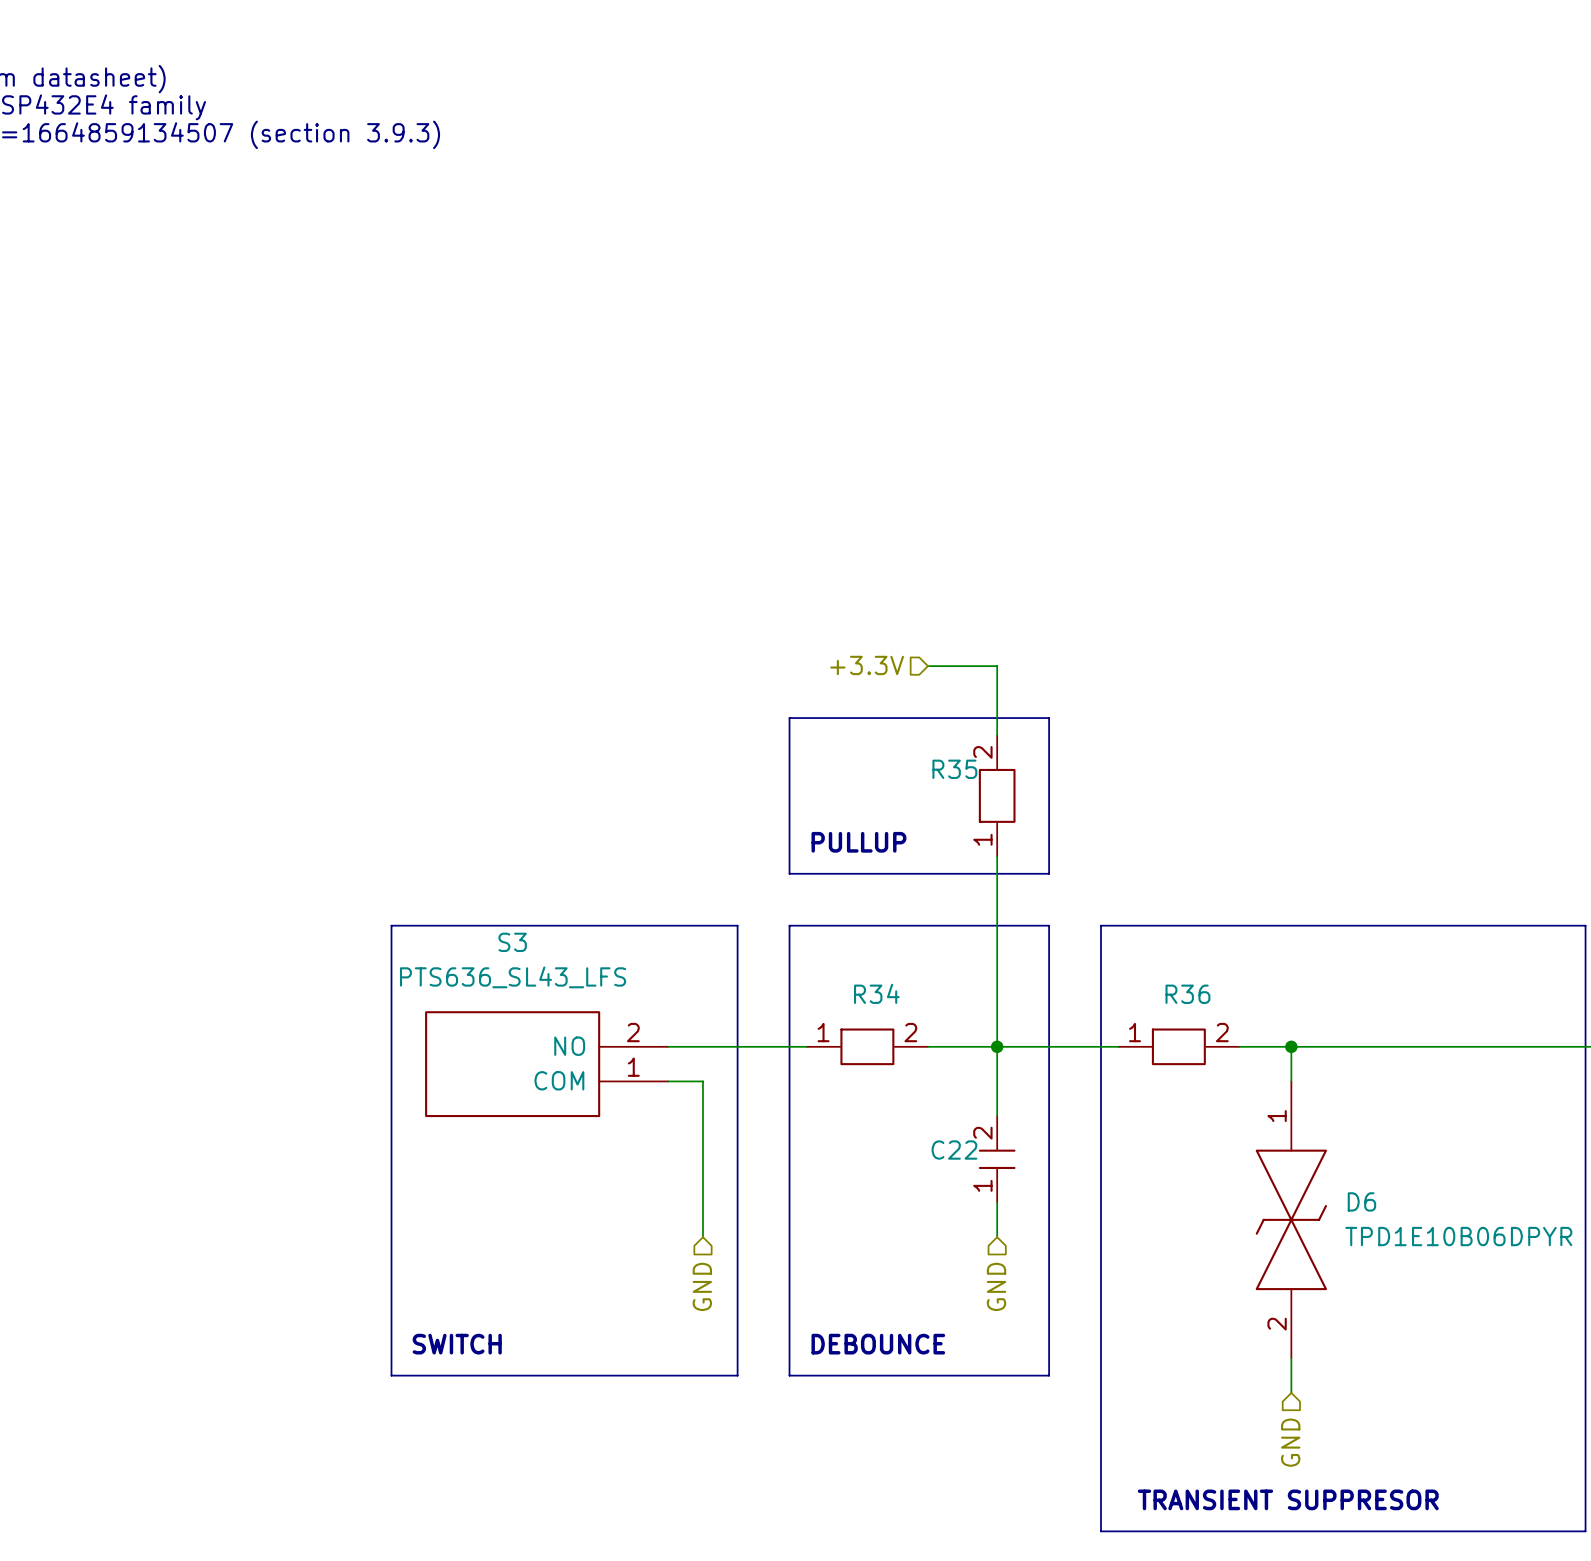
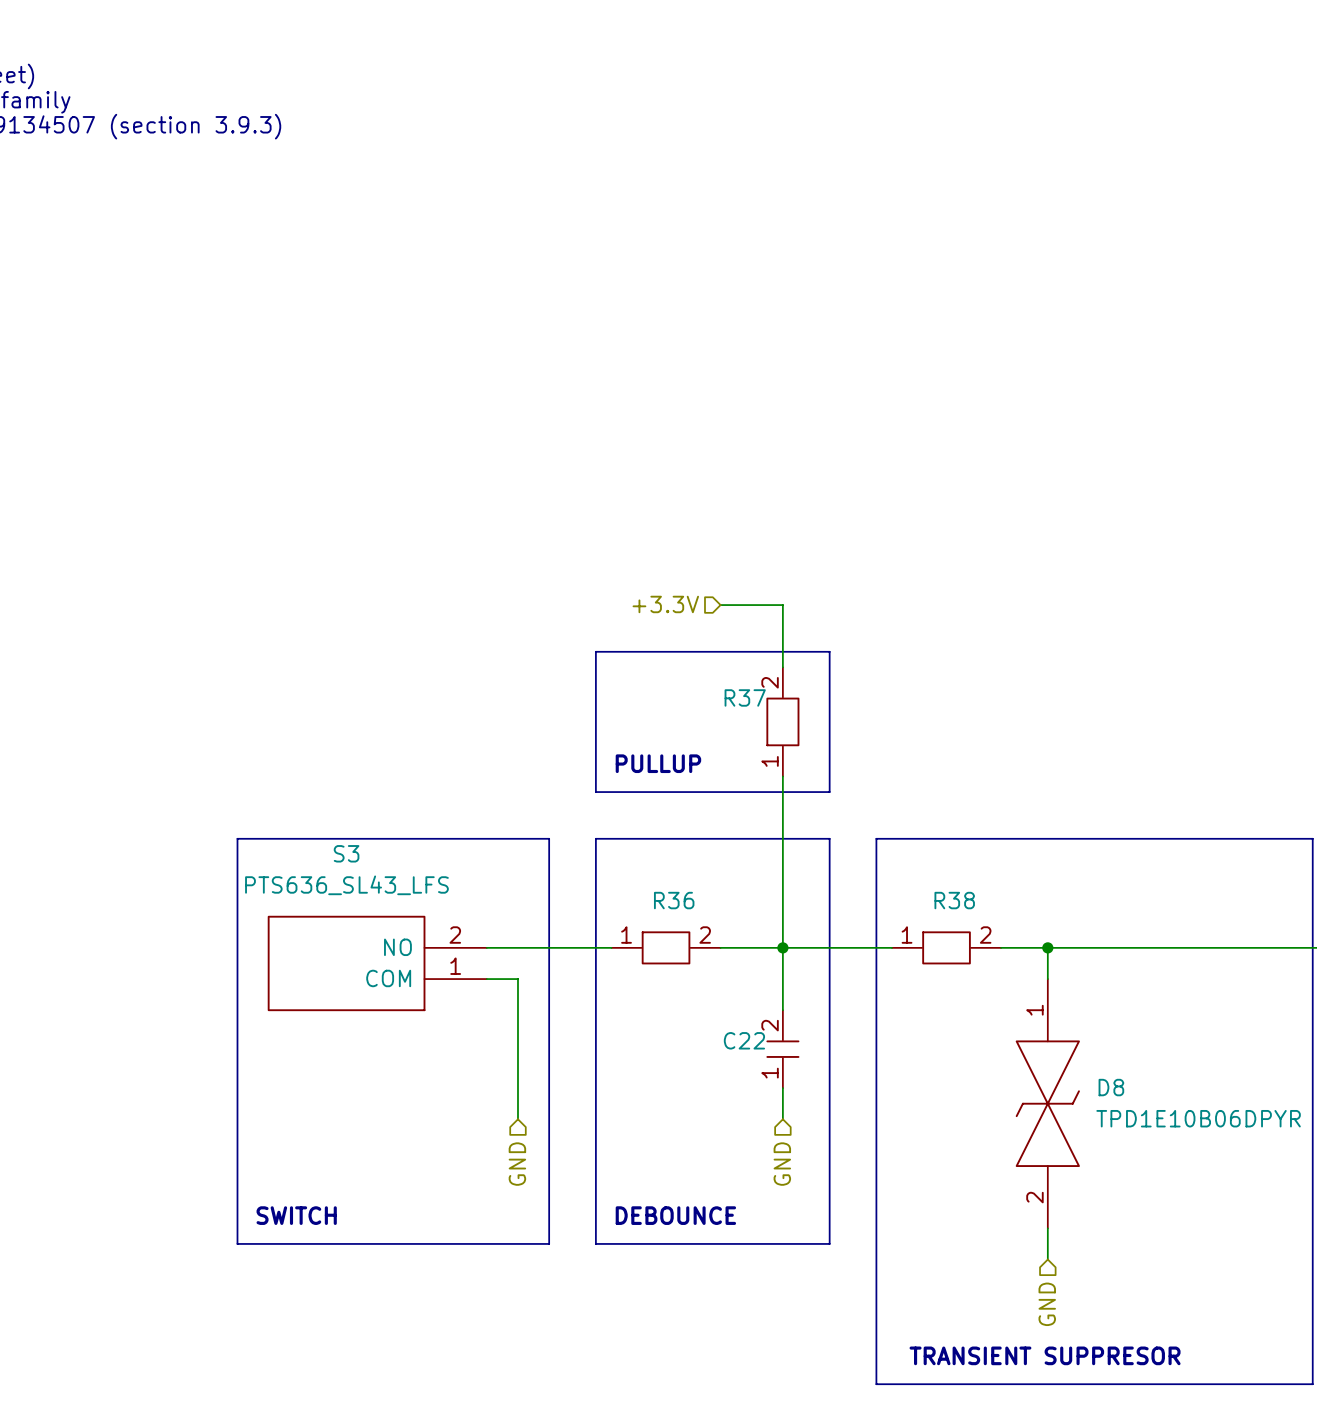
R35 name: R35 (954, 769) -> R37 (745, 697)
R34 name: R34 (876, 993) -> R36 (674, 900)
R36 name: R36 (1187, 994) -> R38 (954, 900)
D6 name: D6 (1361, 1201) -> D8 (1111, 1087)

